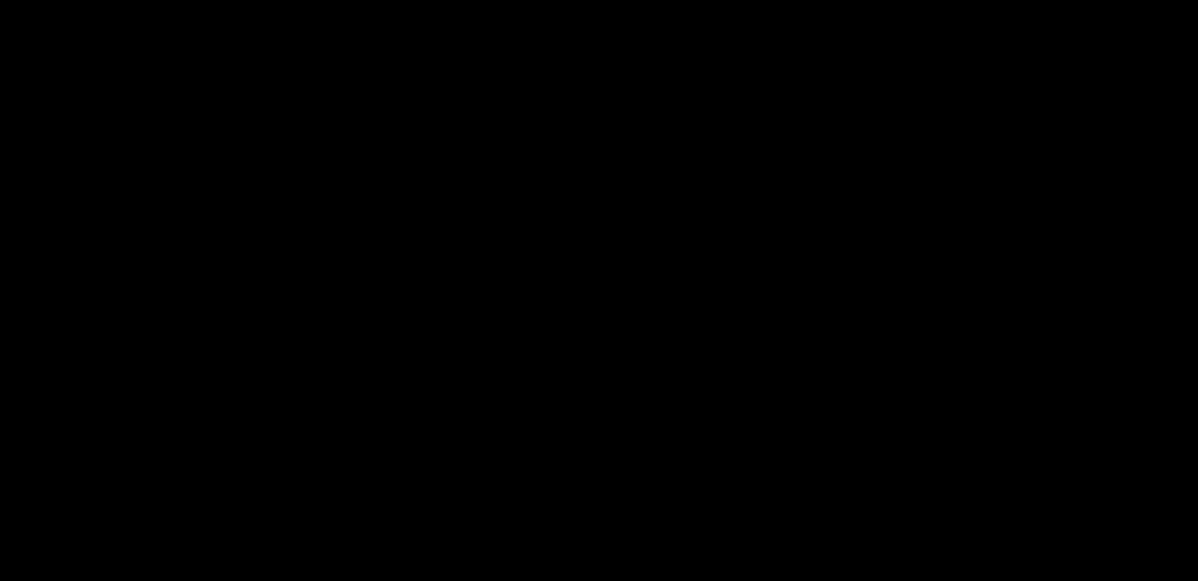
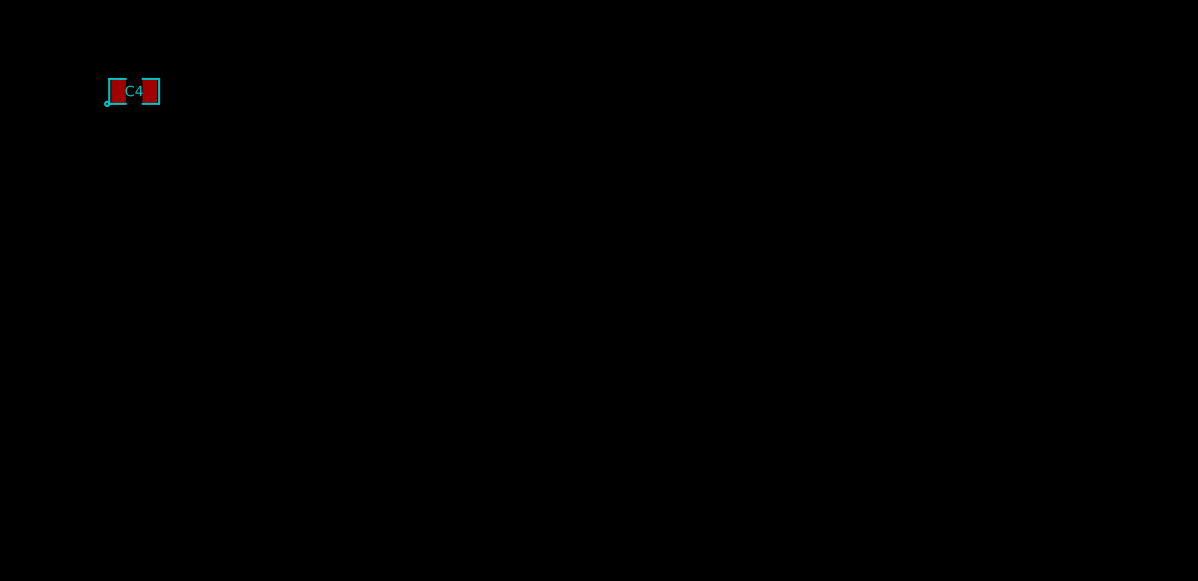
C4: none -> (132, 92)

